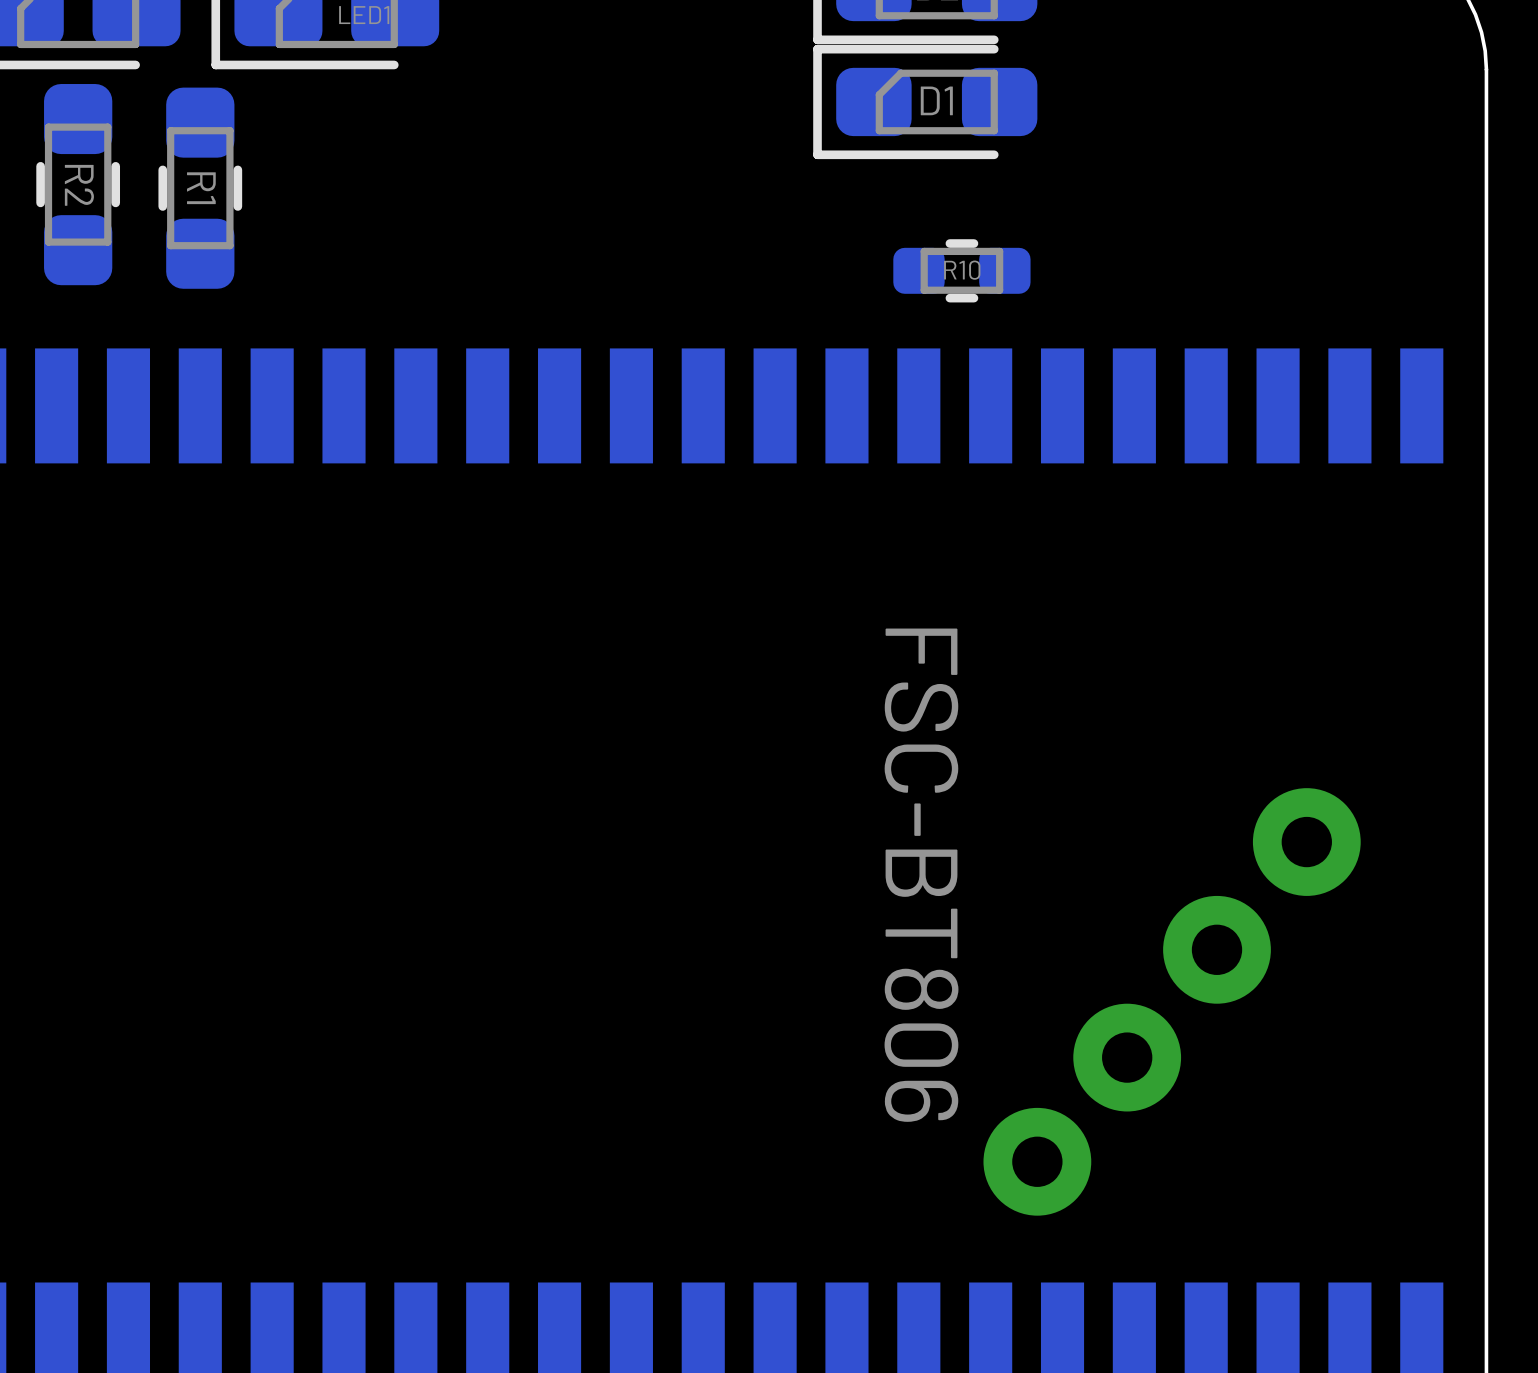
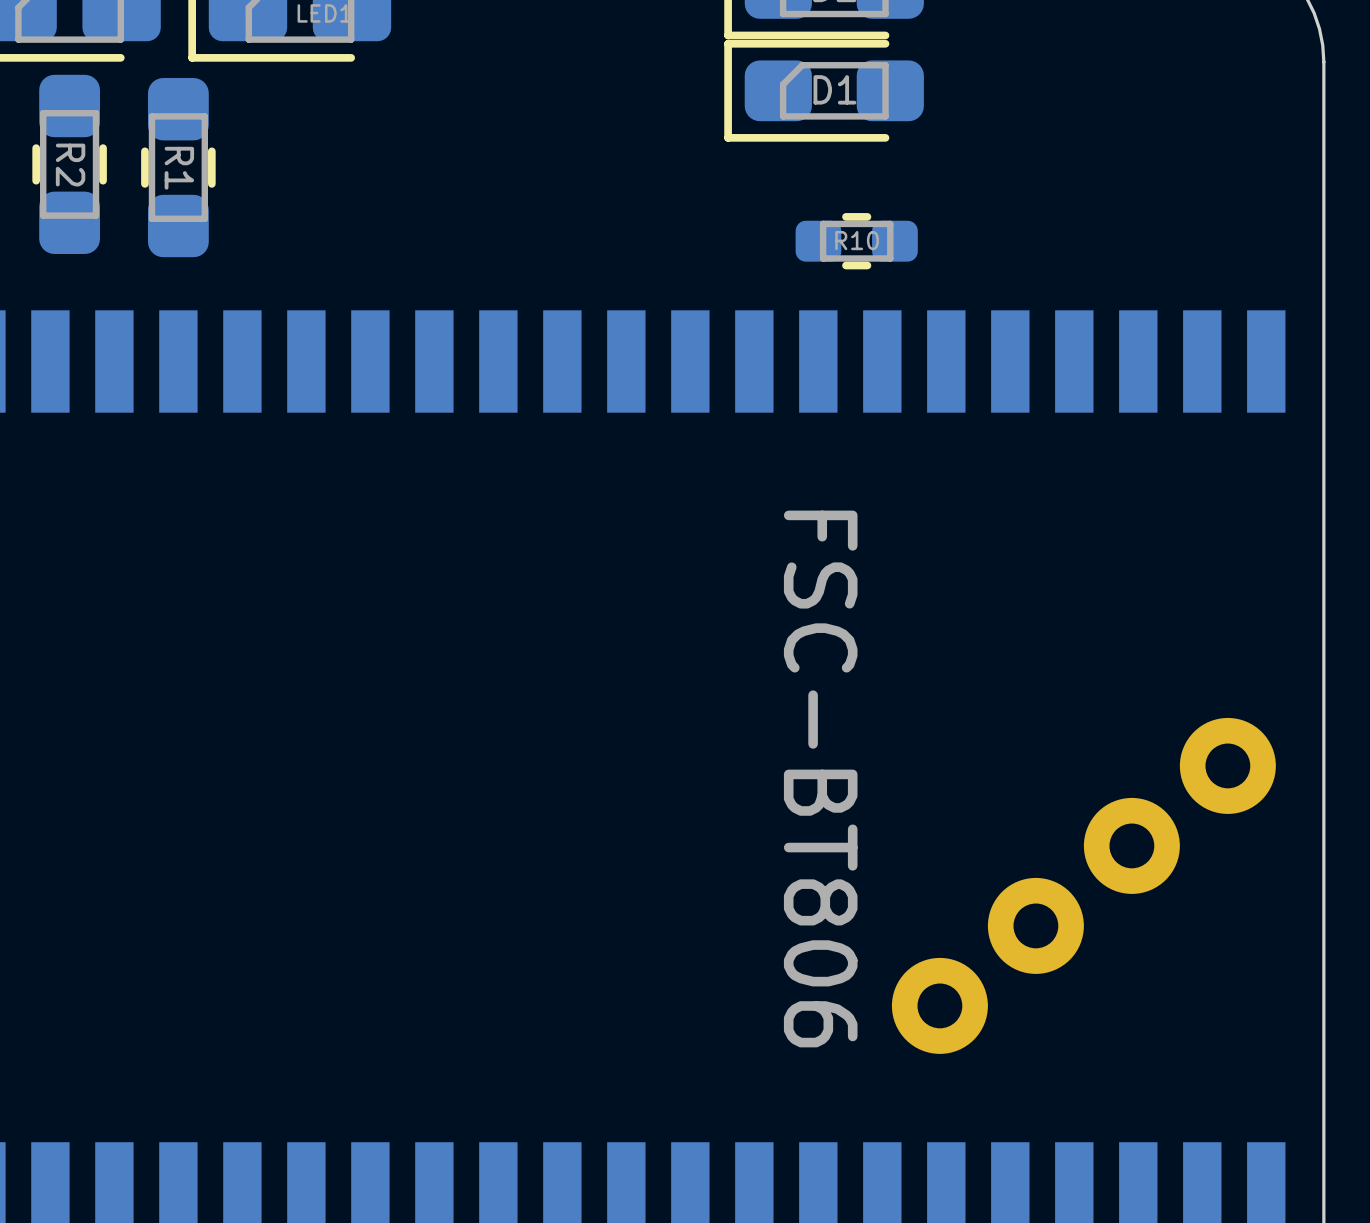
part: (1306, 842) -> none
part: none -> (1227, 765)
part position: (1217, 949) -> (1131, 845)
part position: (1127, 1057) -> (1035, 925)
part position: (1037, 1161) -> (939, 1005)

